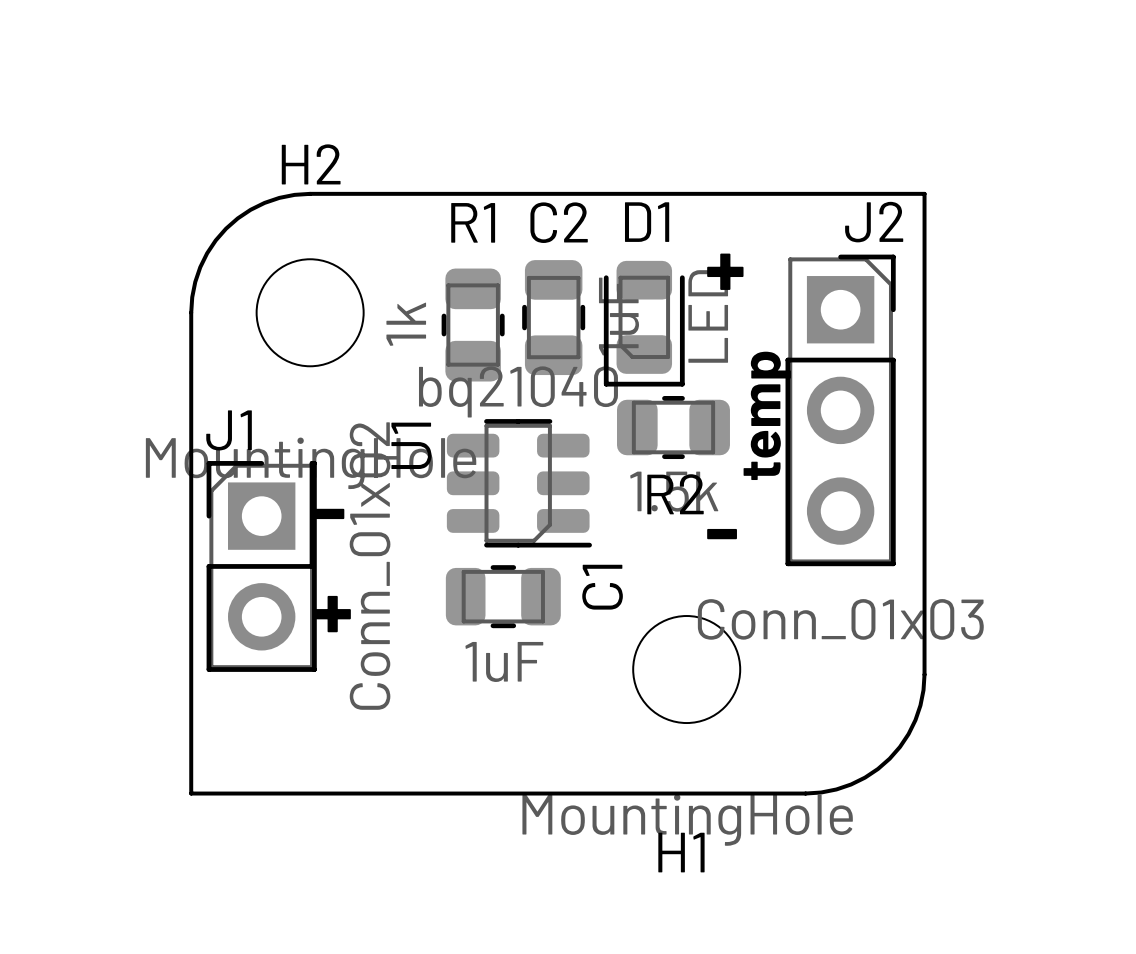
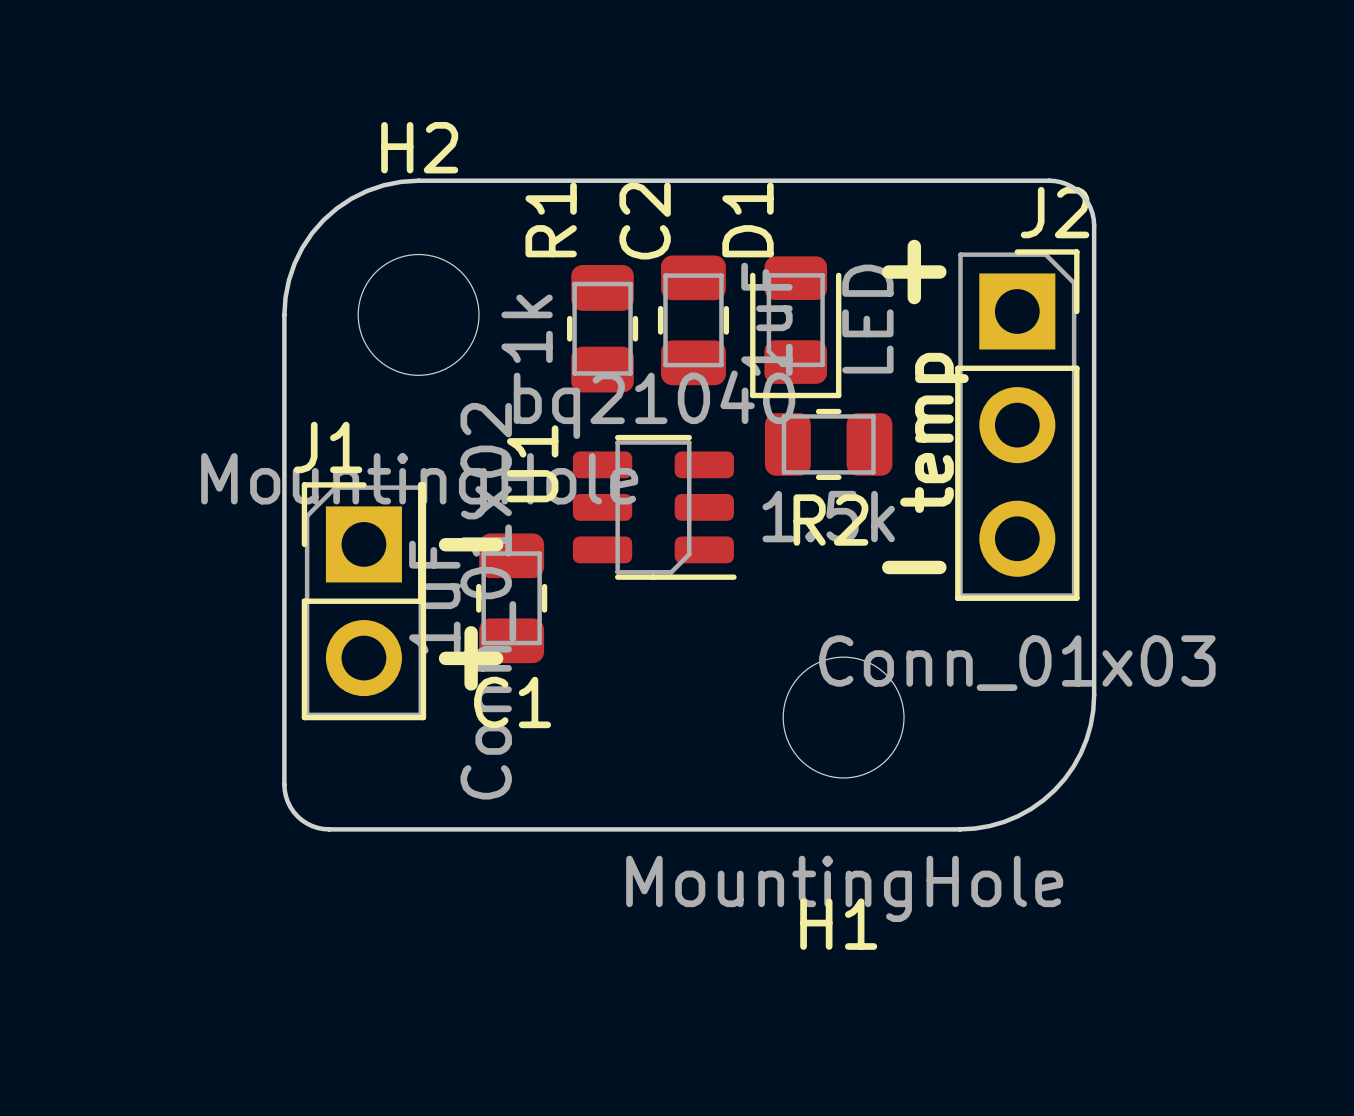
board edge: (869, 193) (924, 193) (923, 690) (920, 705) (908, 734) (899, 747) (878, 768) (865, 777) (836, 789) (805, 793) (191, 793) (191, 728) -> (1049, 180) (1066, 184) (1076, 189) (1088, 203) (1093, 219) (1094, 695) (1090, 725) (1080, 753) (1064, 778) (1043, 800) (1018, 816) (1004, 821) (989, 826) (959, 829) (329, 829) (312, 826) (297, 816) (287, 801) (284, 784)
R1 name rotation: 0° (473, 222) -> 90° counterclockwise (551, 219)
C2 name rotation: 0° (559, 222) -> 90° counterclockwise (645, 220)
D1 name rotation: 0° (647, 222) -> 90° counterclockwise (747, 219)
C1 rotation: 0° (503, 596) -> 90° clockwise (511, 598)
C1 position: (503, 596) -> (511, 598)

